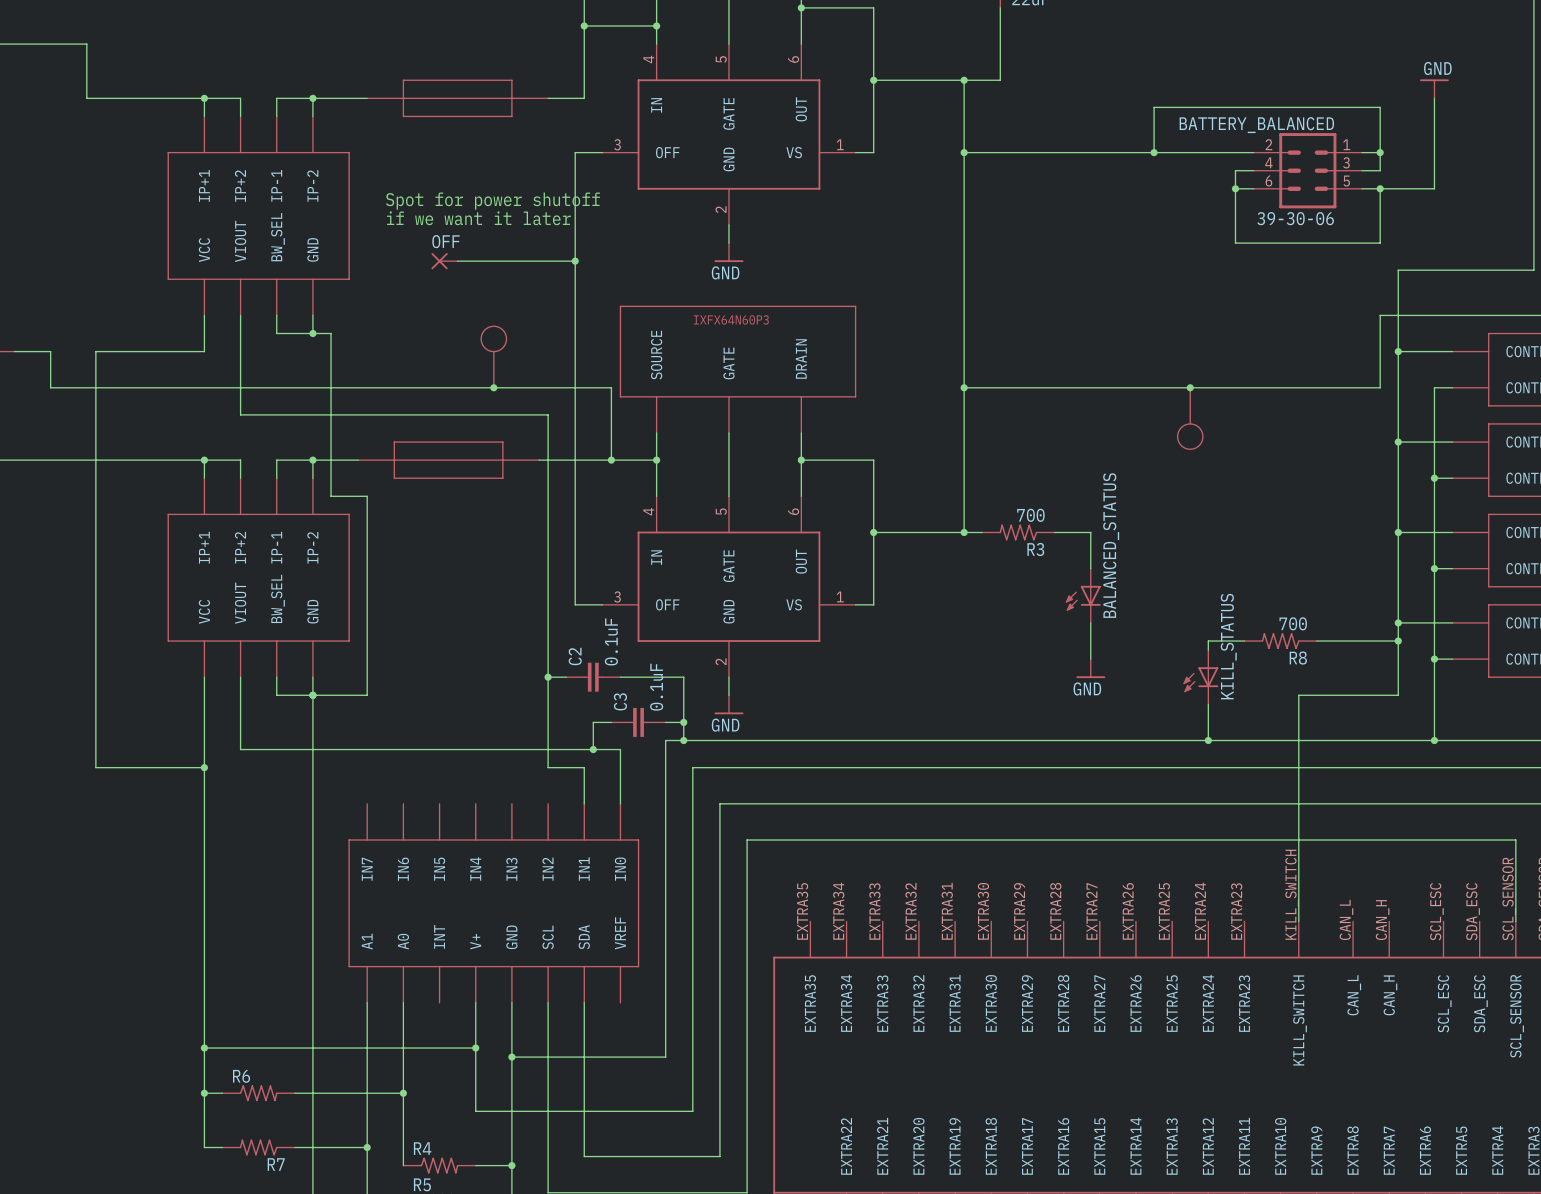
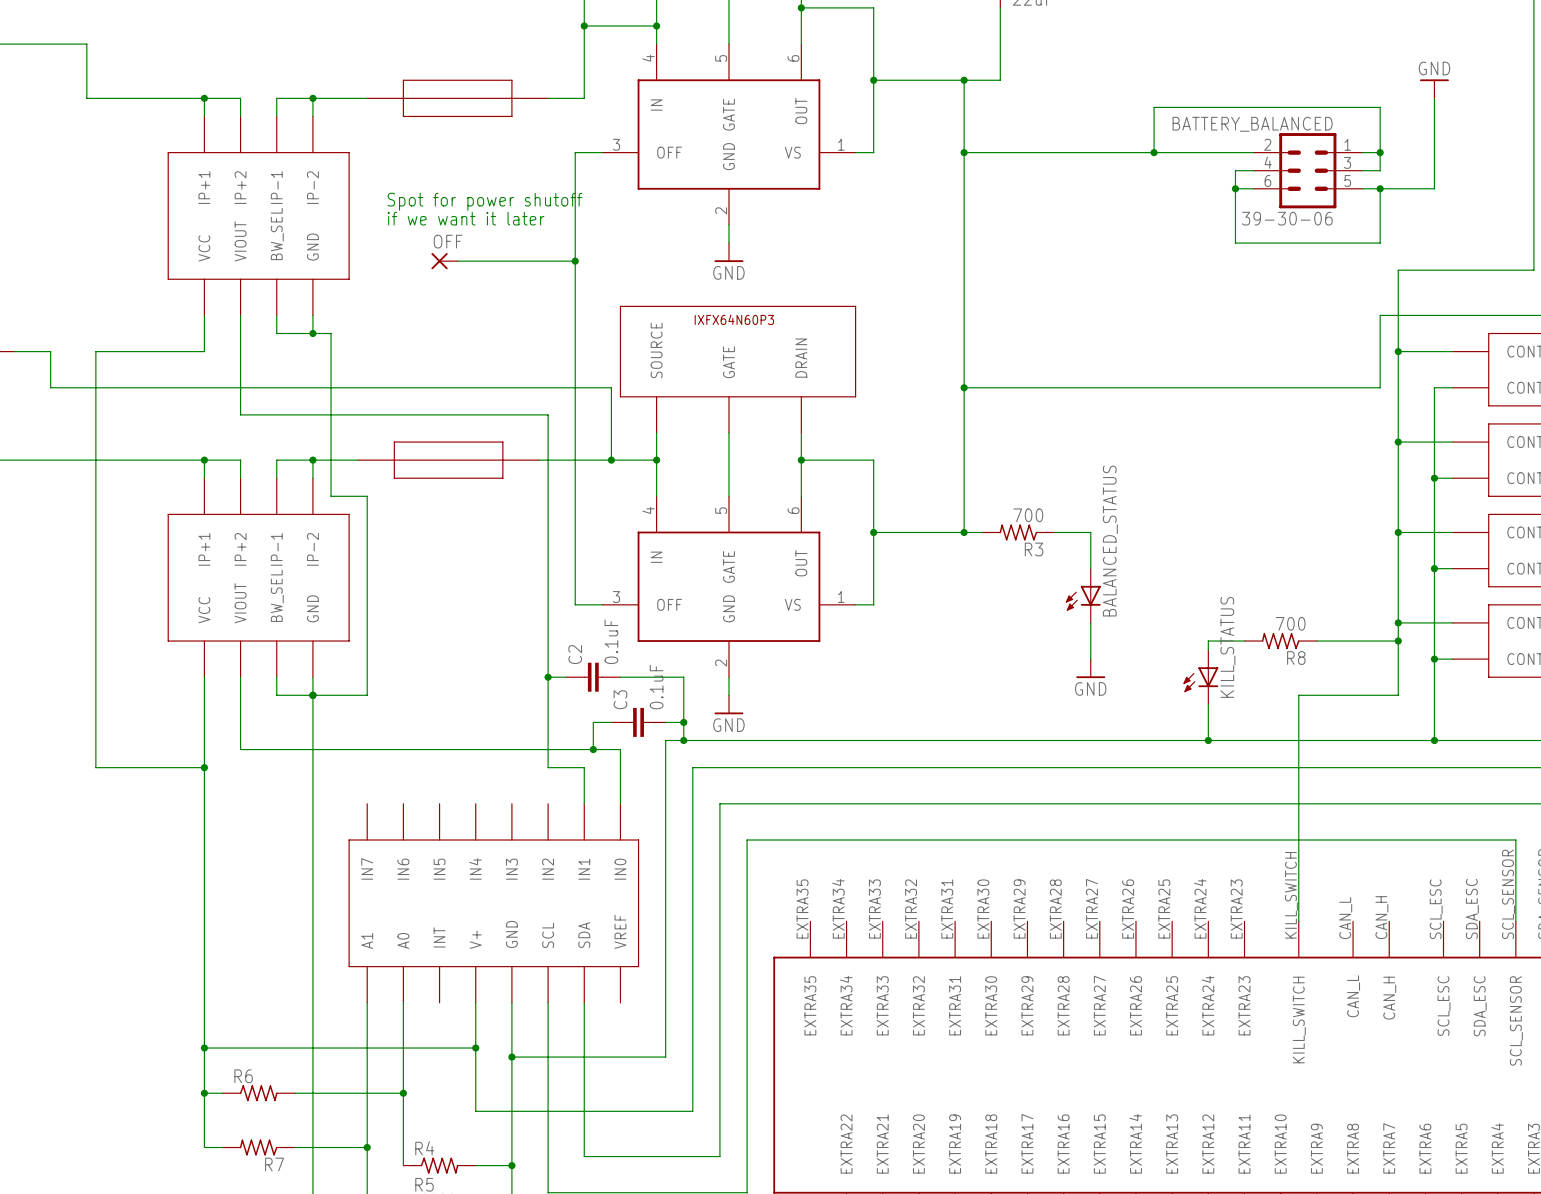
part: (493, 356) -> none
junction: (493, 387) -> none
junction: (1190, 387) -> none
part: (1190, 418) -> none

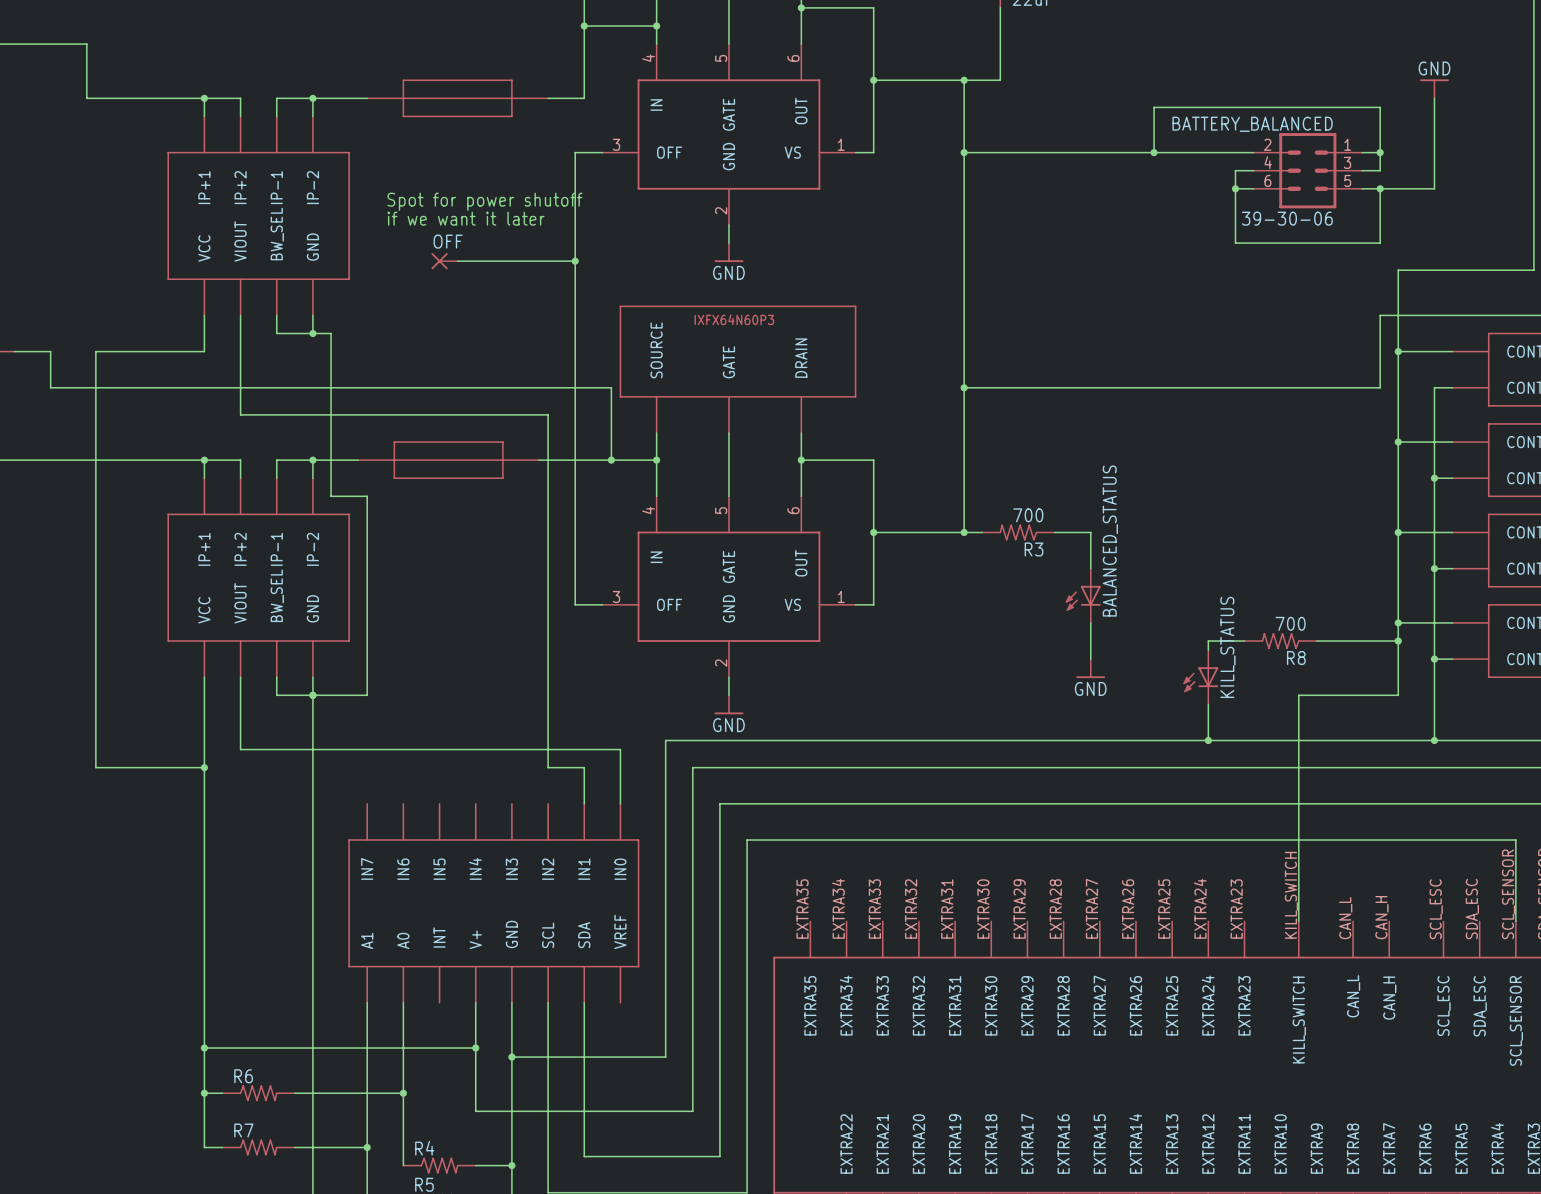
wire: (548, 677) (566, 677) -> none
junction: (548, 677) -> none
C2: 0.1uF (593, 677) -> none
wire: (620, 677) (683, 677) (683, 740) -> none
wire: (611, 722) (593, 722) (593, 749) -> none
C3: 0.1uF (638, 722) -> none
wire: (665, 722) (683, 722) -> none
junction: (683, 722) -> none
junction: (683, 740) -> none
junction: (593, 749) -> none
R7 rotation: 0° (258, 1147) -> 180° (258, 1147)

